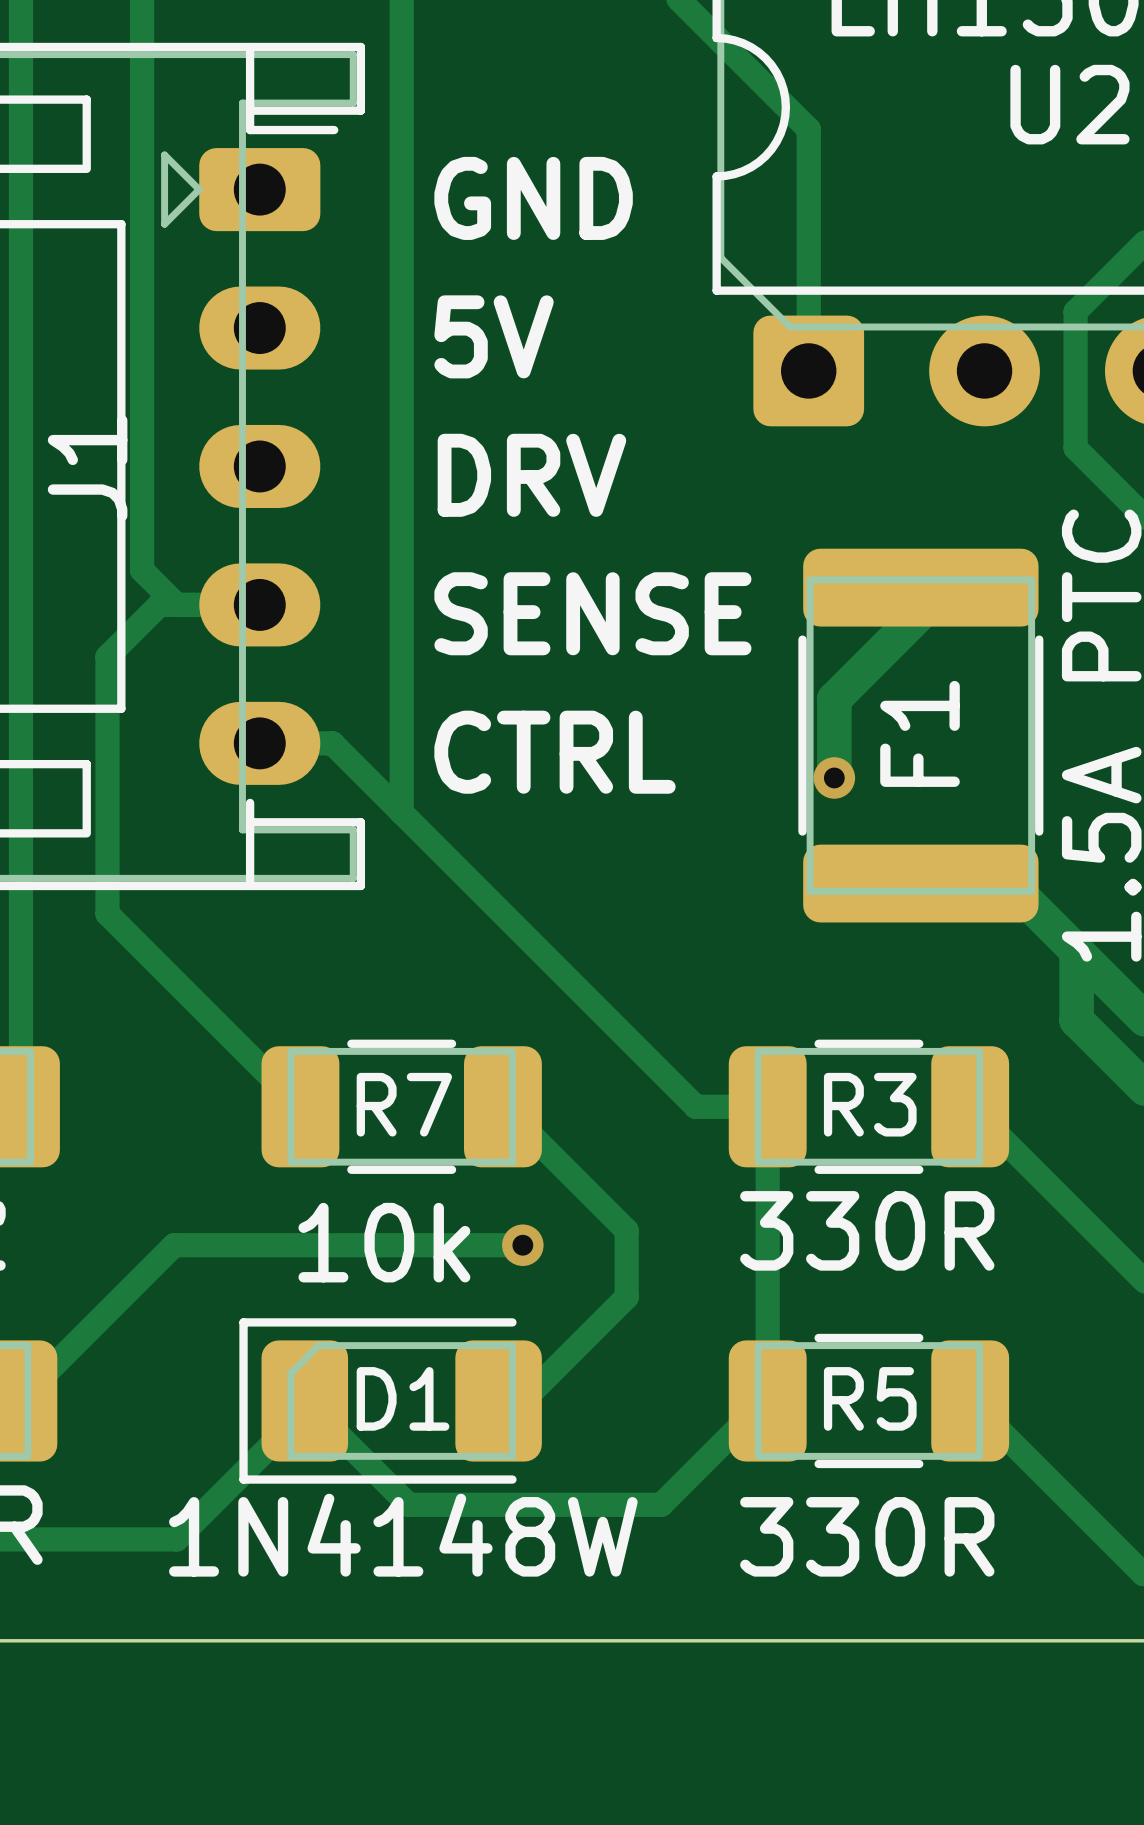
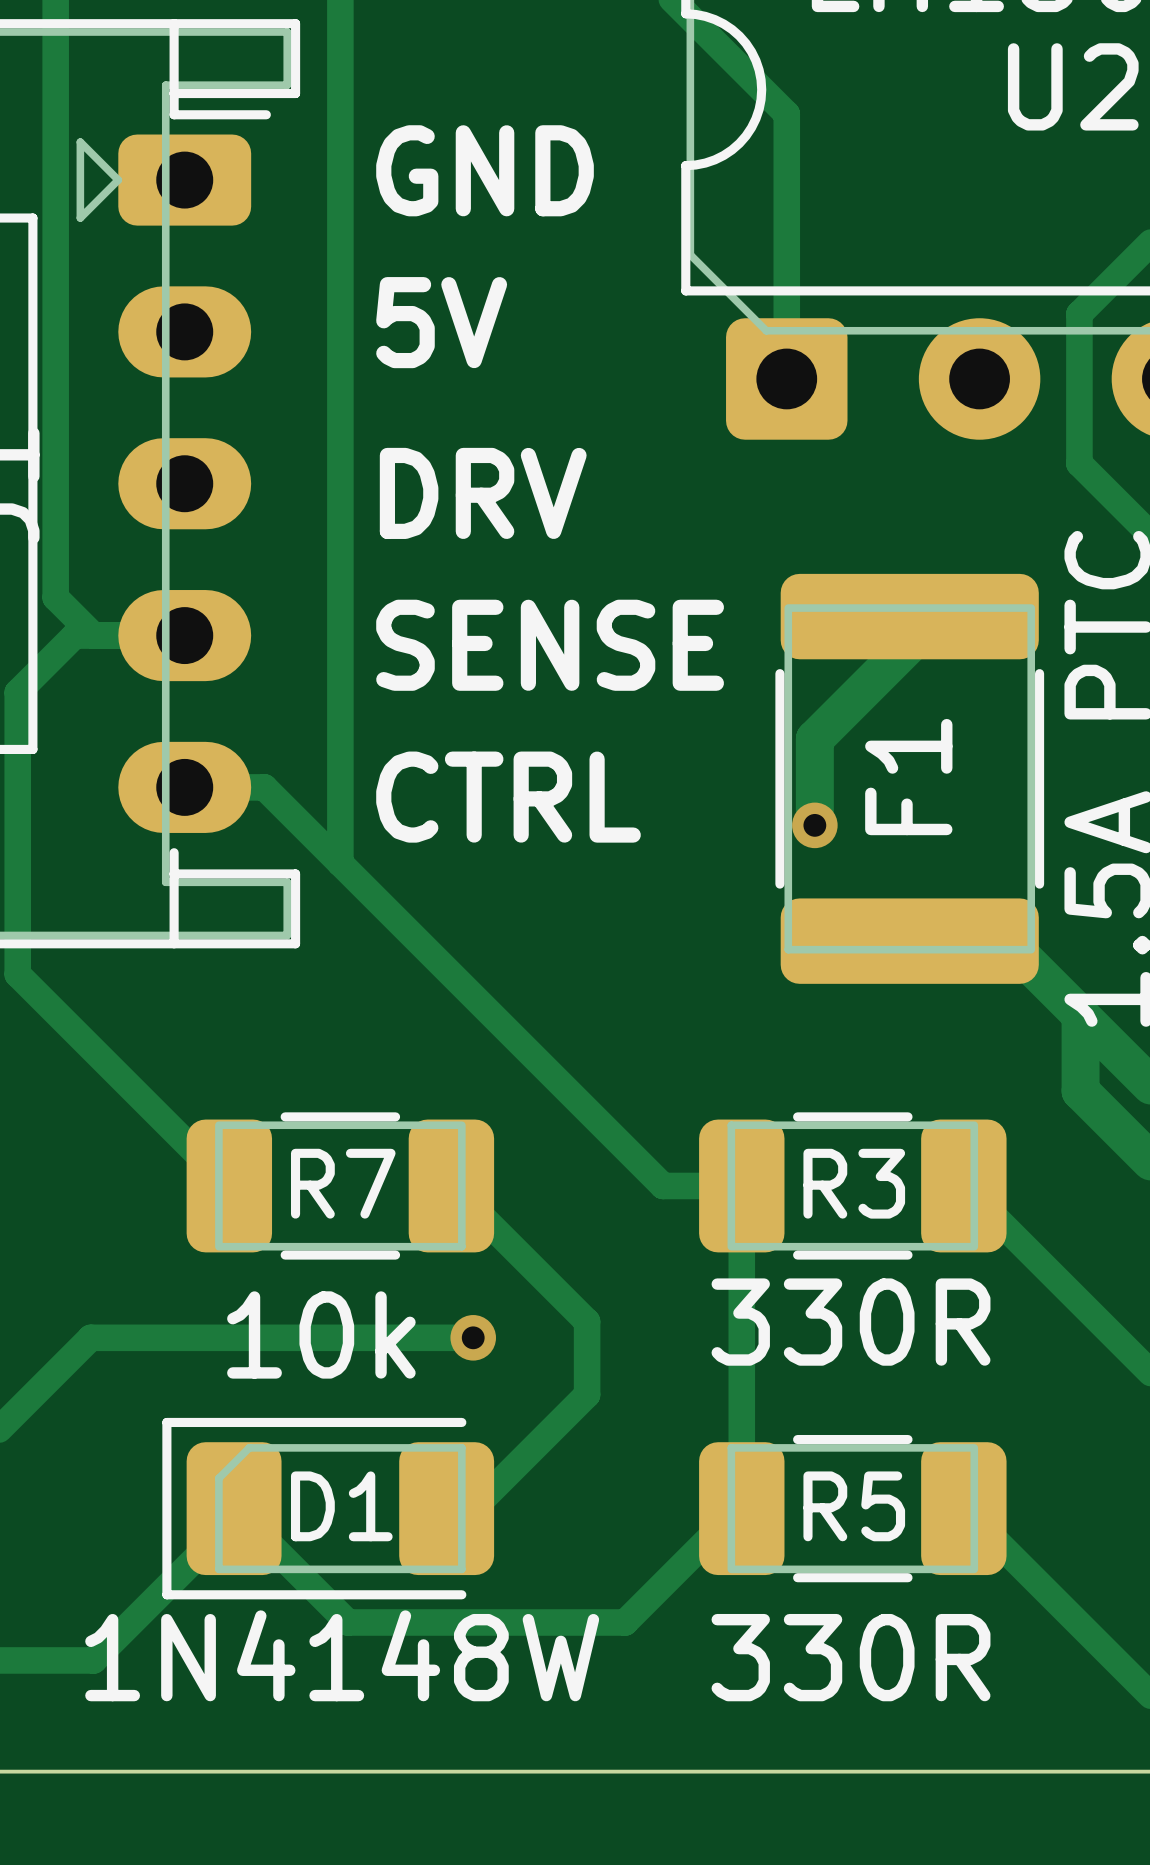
text position: GND (533, 198) -> GND (485, 170)
text position: 5V (494, 336) -> 5V (441, 322)

